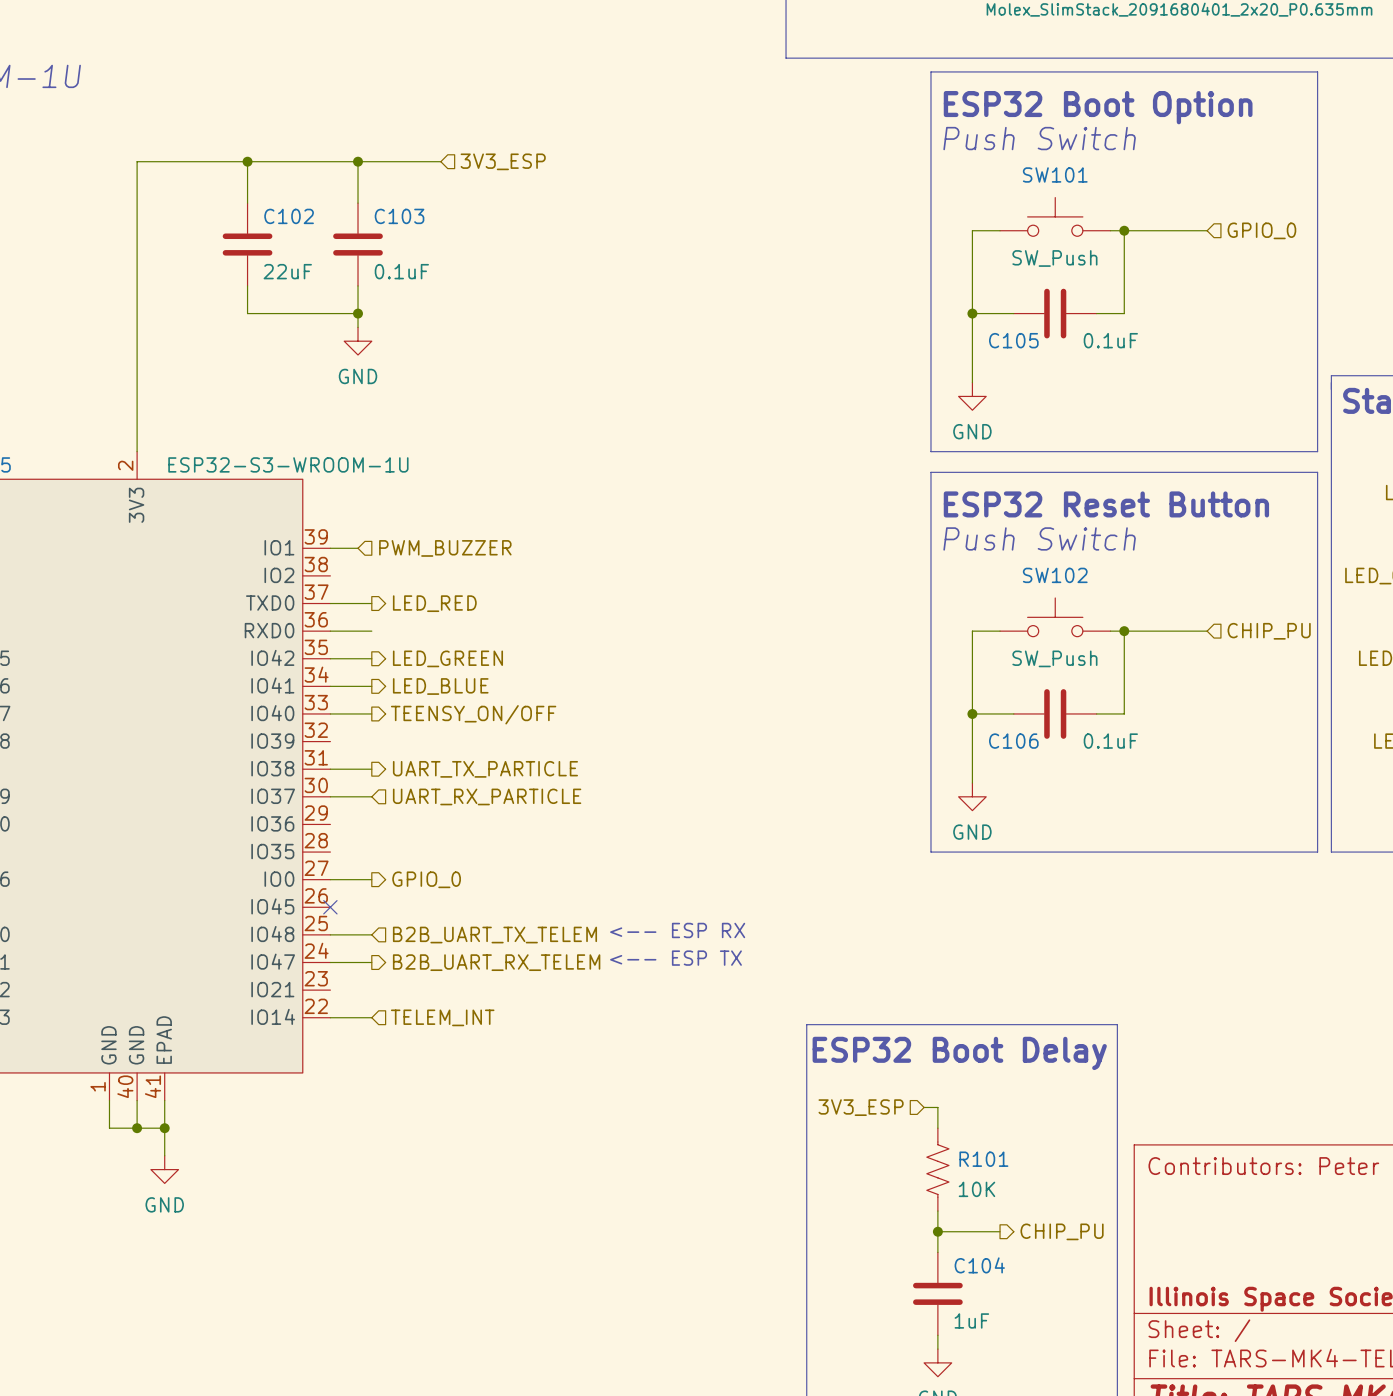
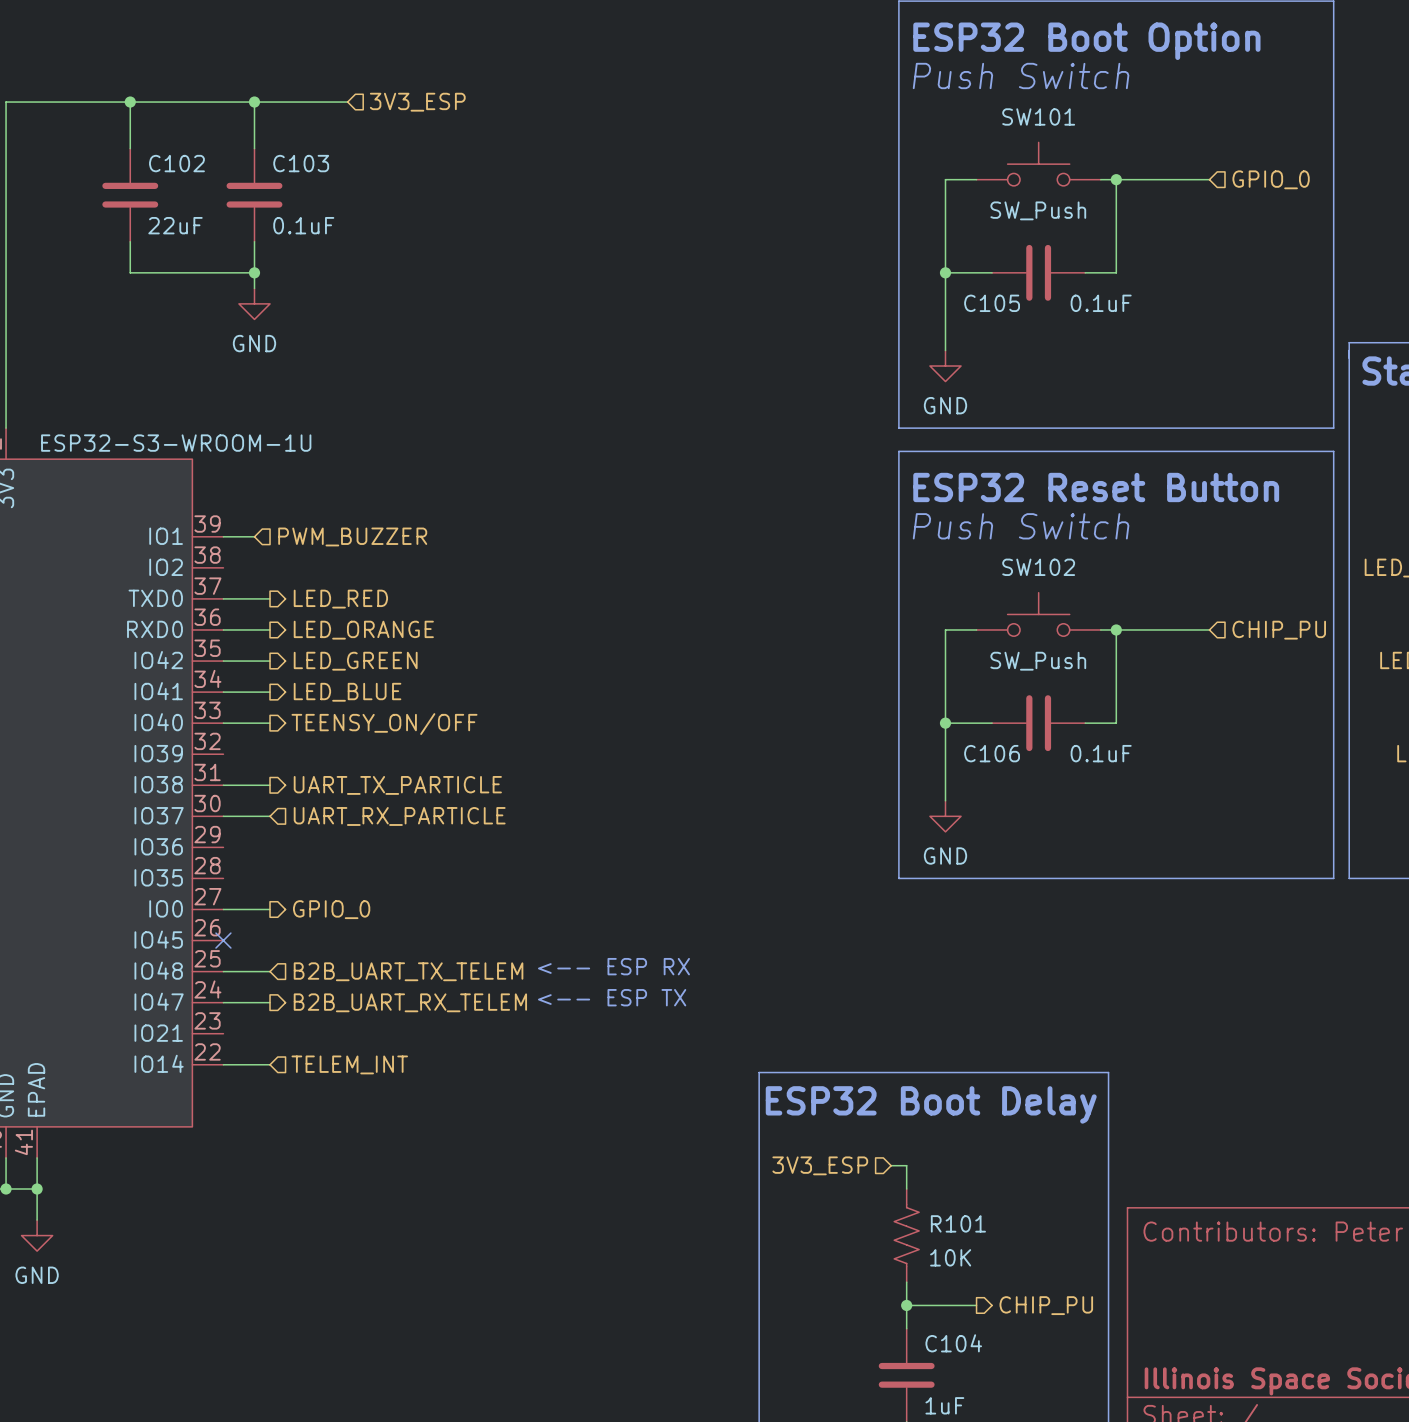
hierarchical label: none -> LED_ORANGE (363, 630)

